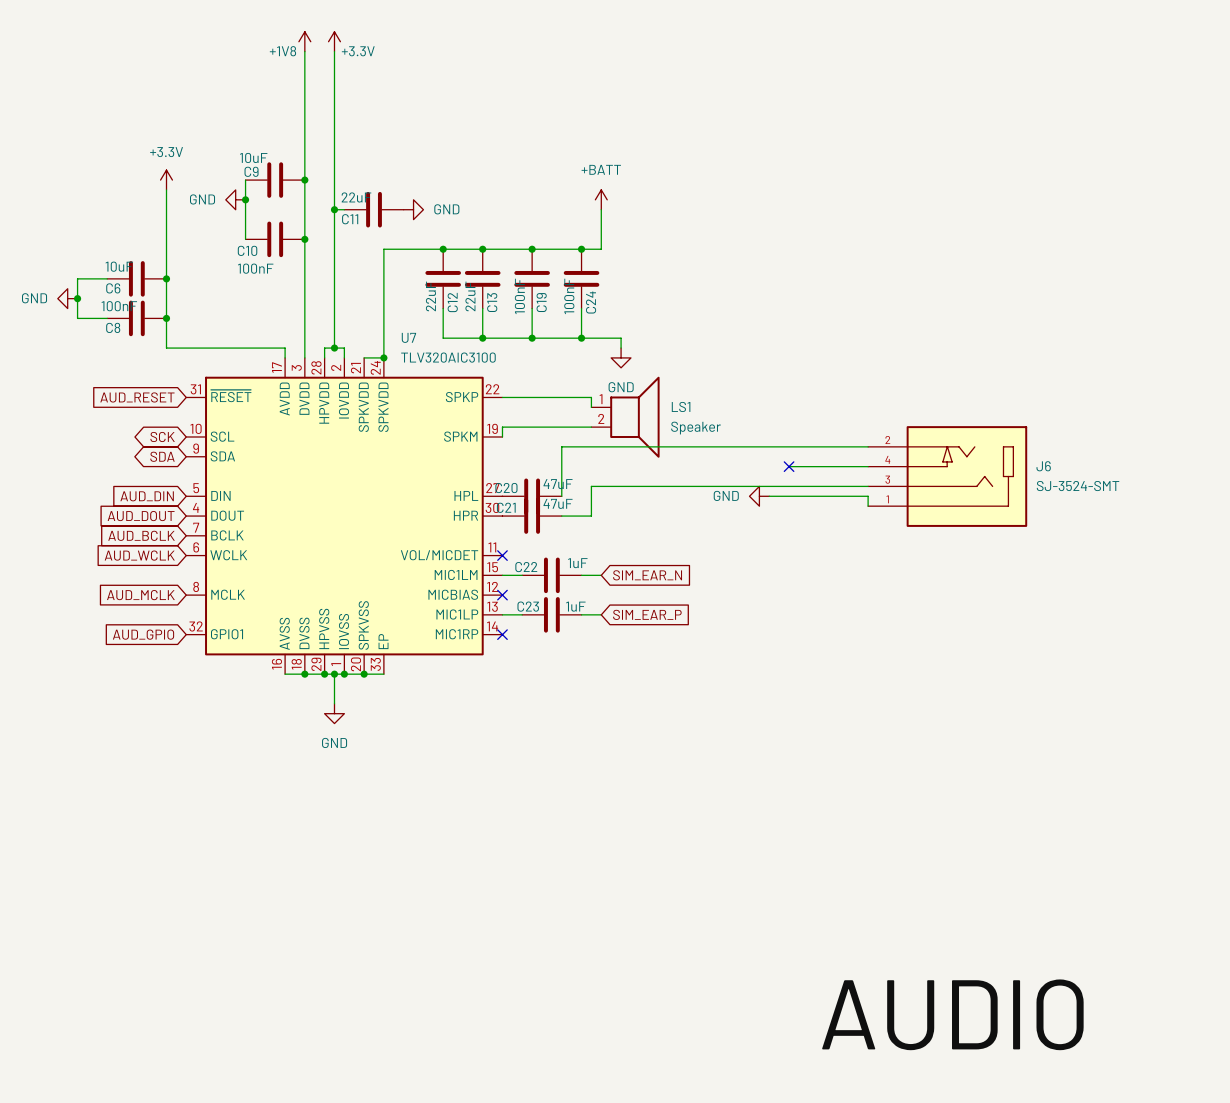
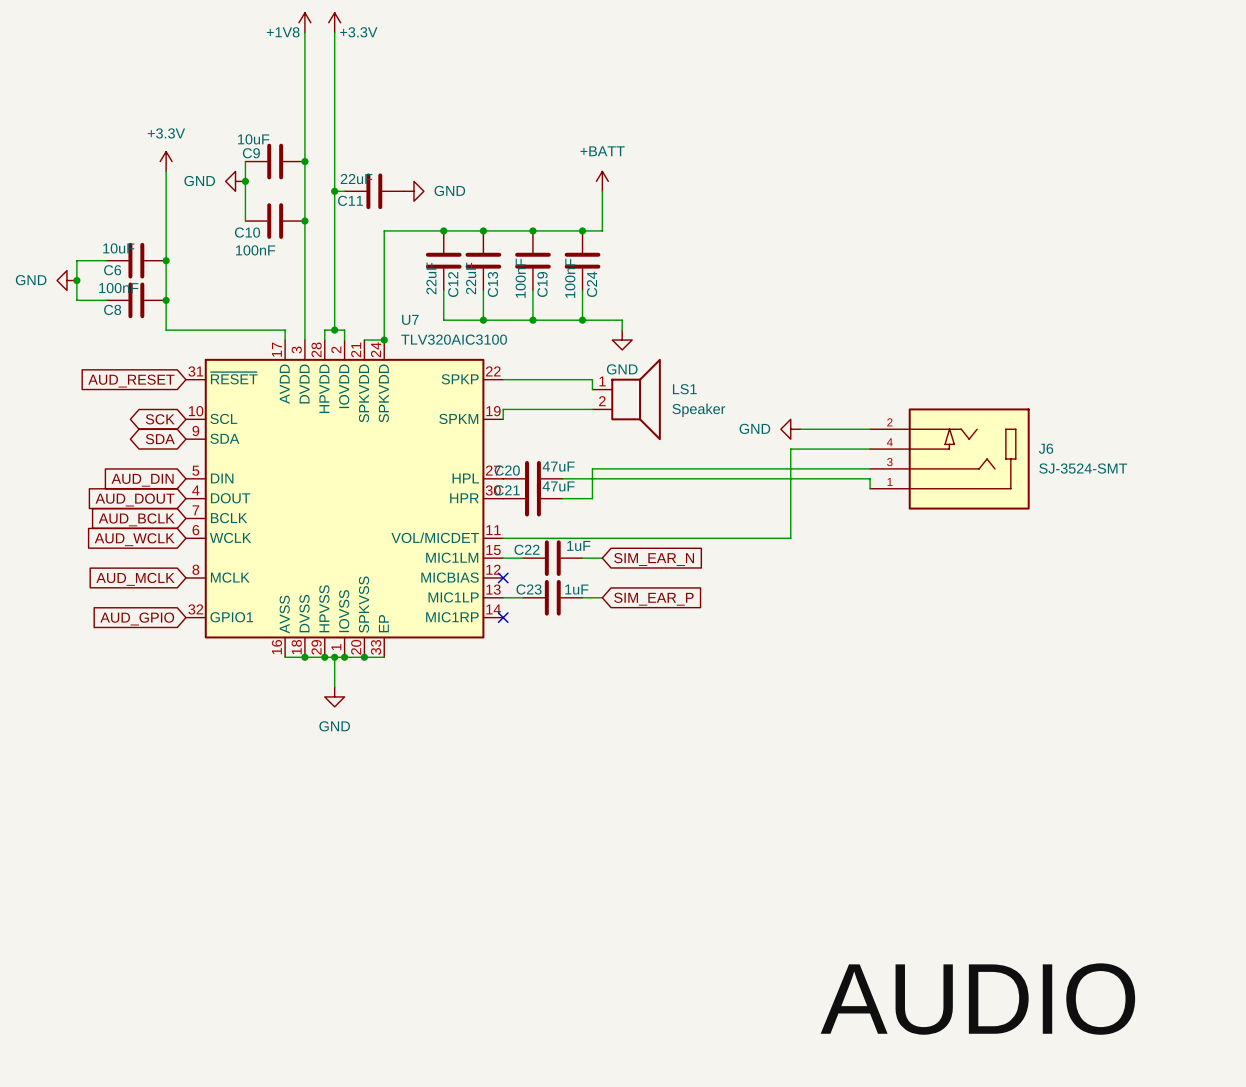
wire: (798, 446) (561, 446) (561, 496) -> (770, 478) (562, 478)
wire: none -> (790, 449) (790, 538) (503, 538)
no-connect mark: (789, 466) -> none
power symbol position: GND (759, 496) -> GND (790, 429)
no-connect mark: (502, 555) -> none

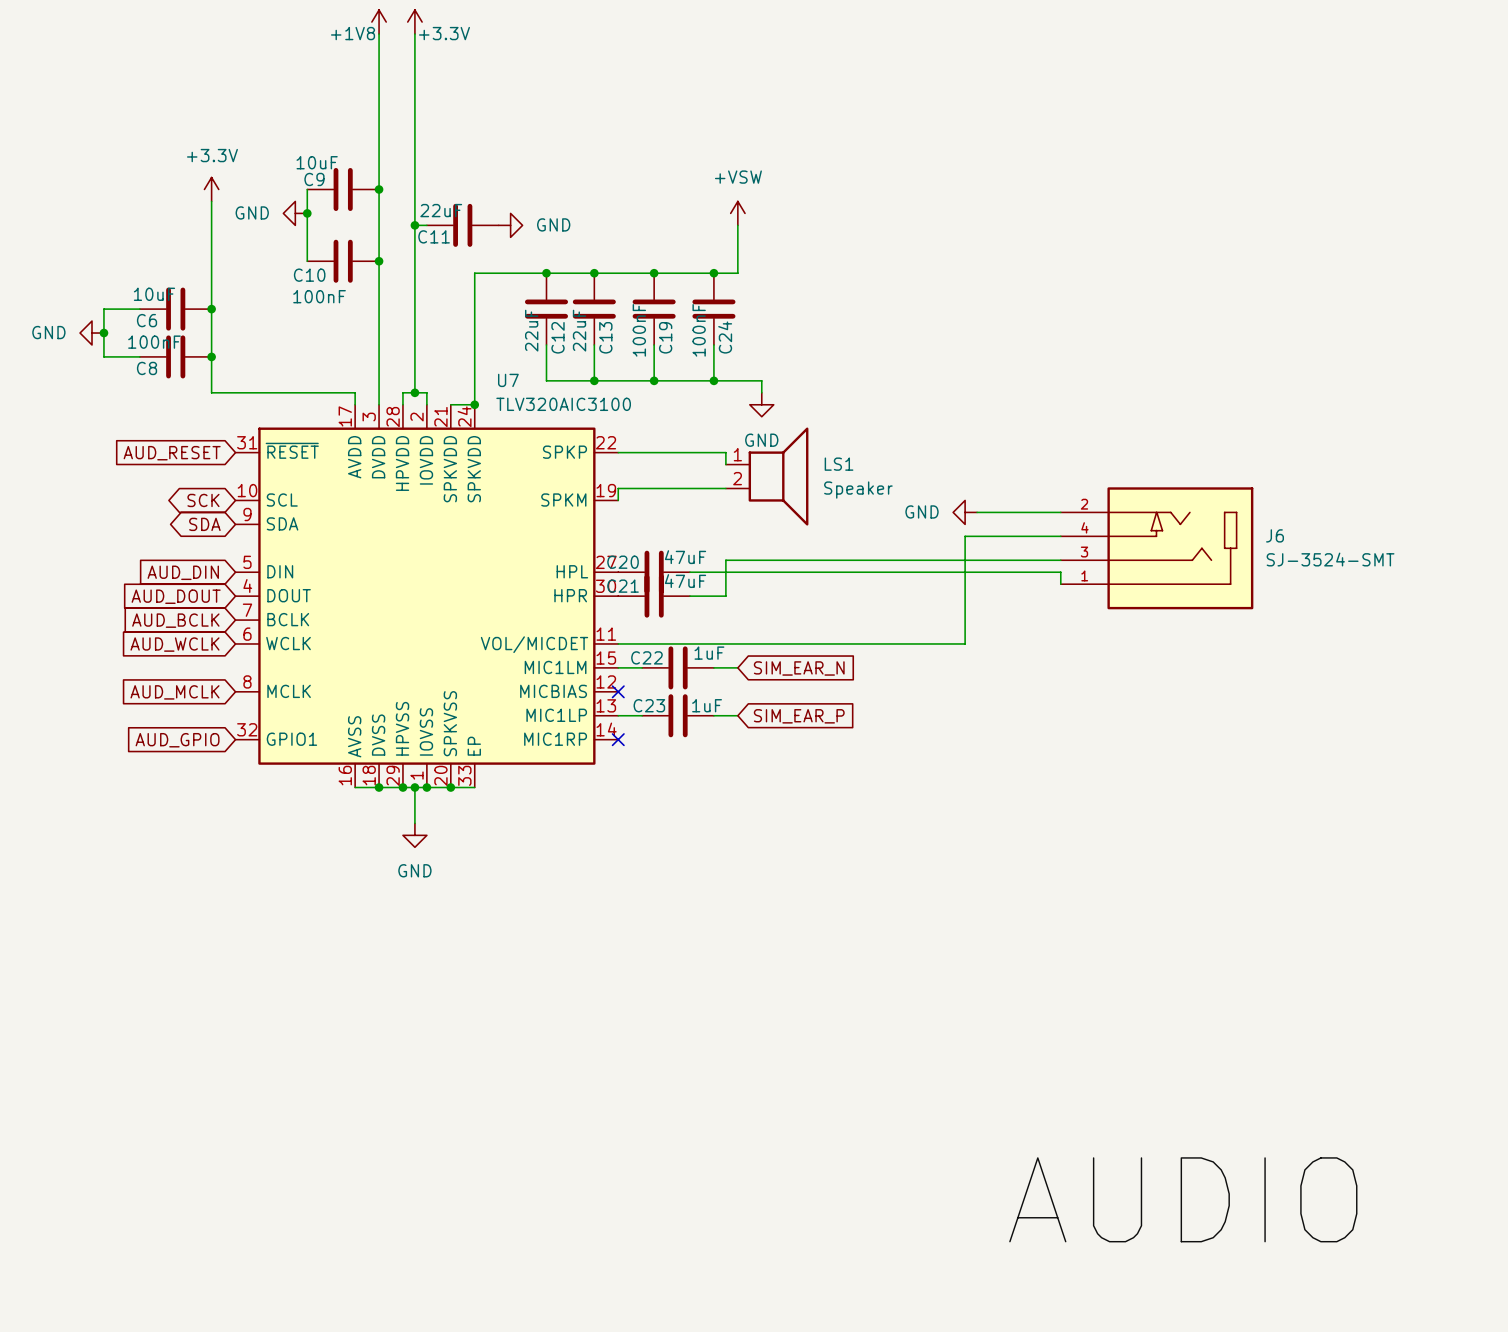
power symbol: +BATT (602, 181) -> +VSW (737, 213)

